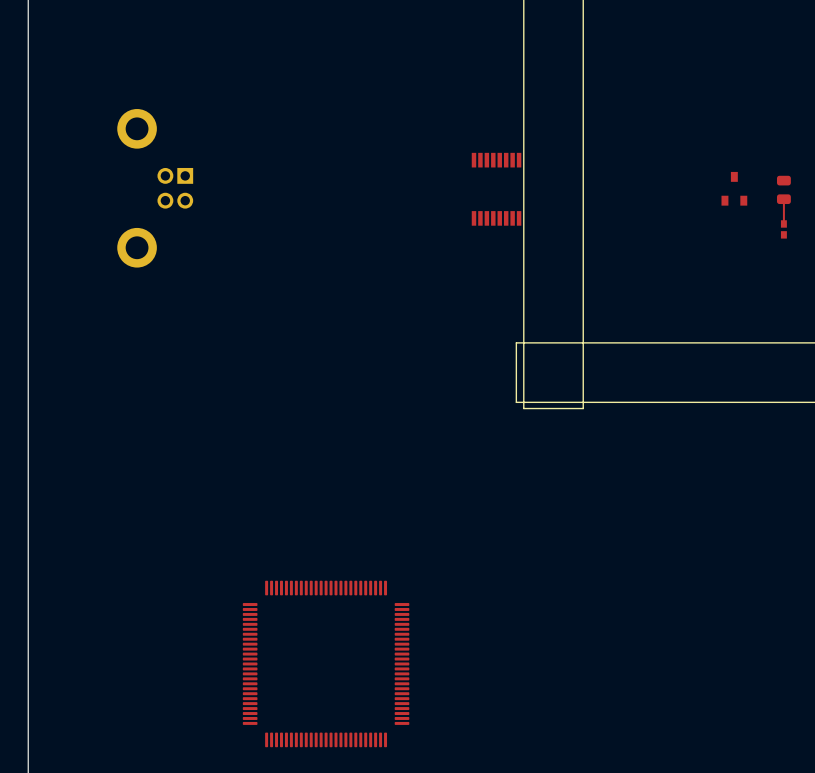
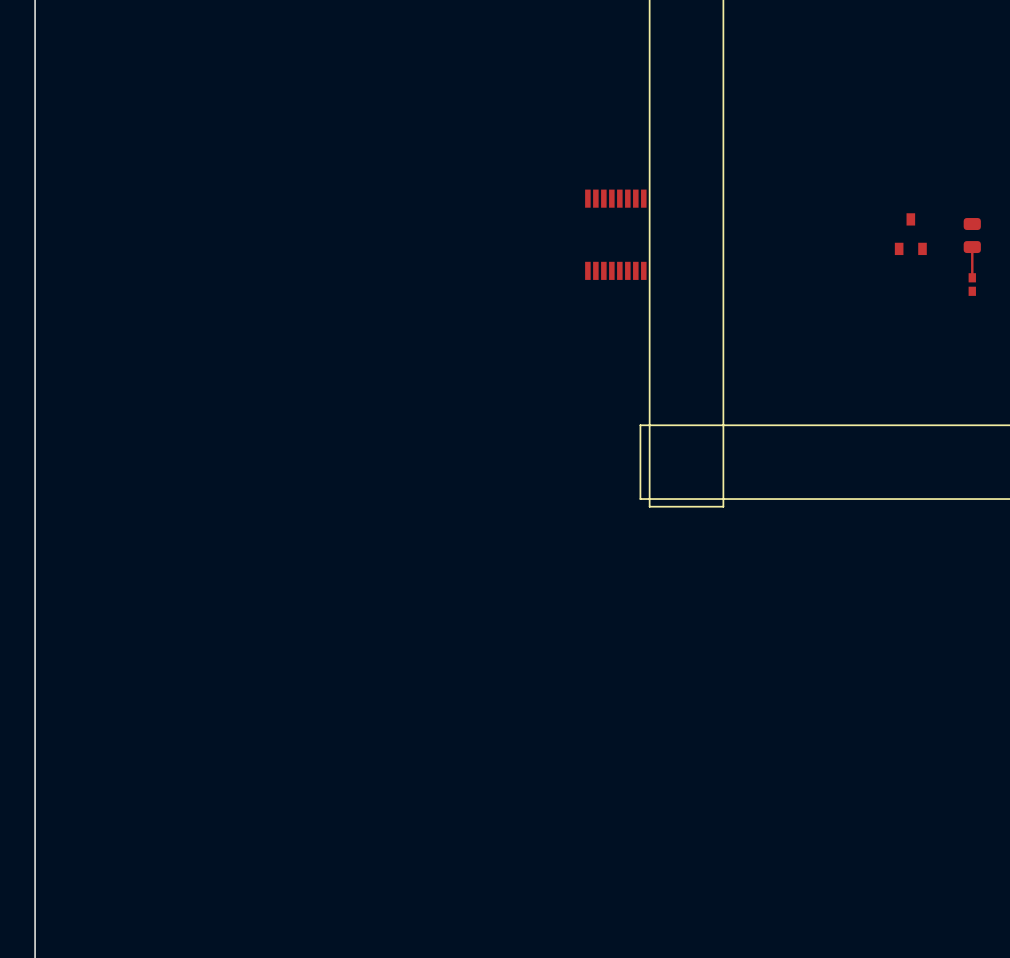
part: (155, 188) -> none
part: (326, 663) -> none

